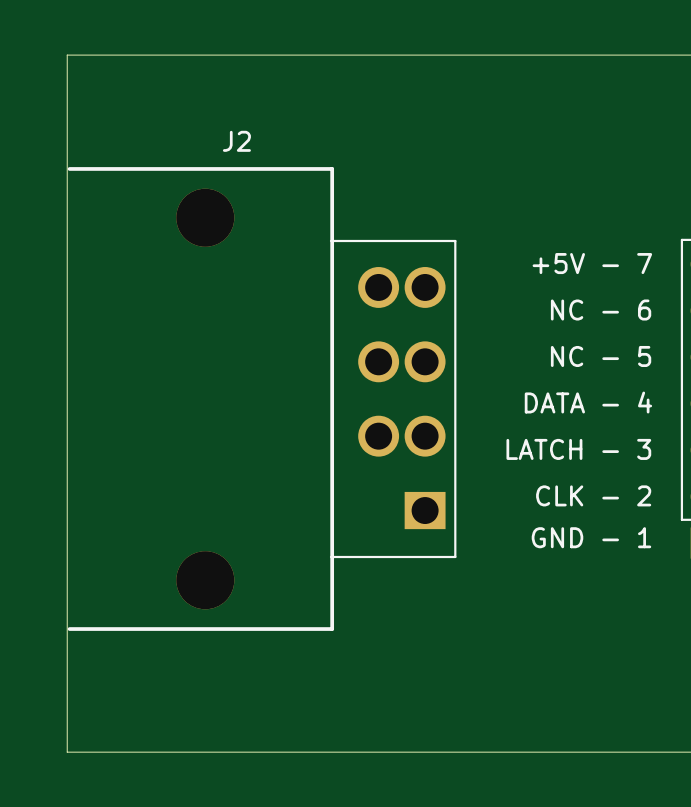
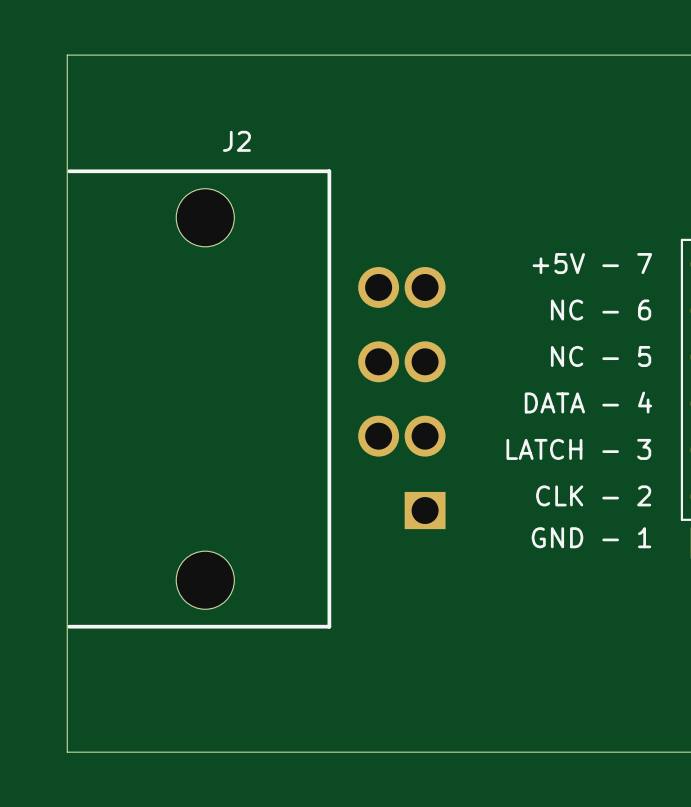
J2 footprint: [67, 167, 457, 631] -> [67, 169, 446, 629]

